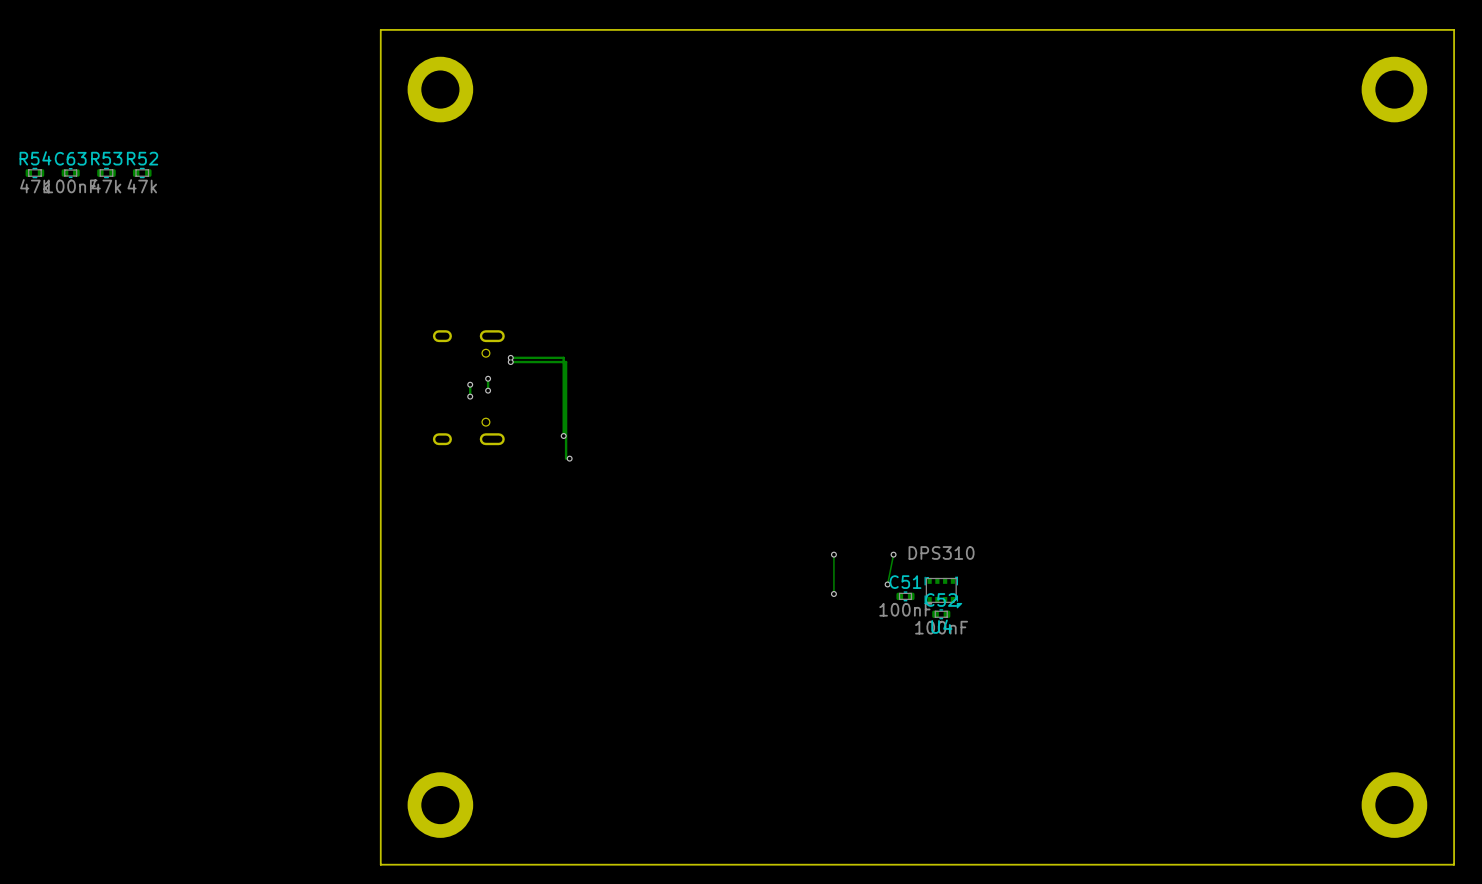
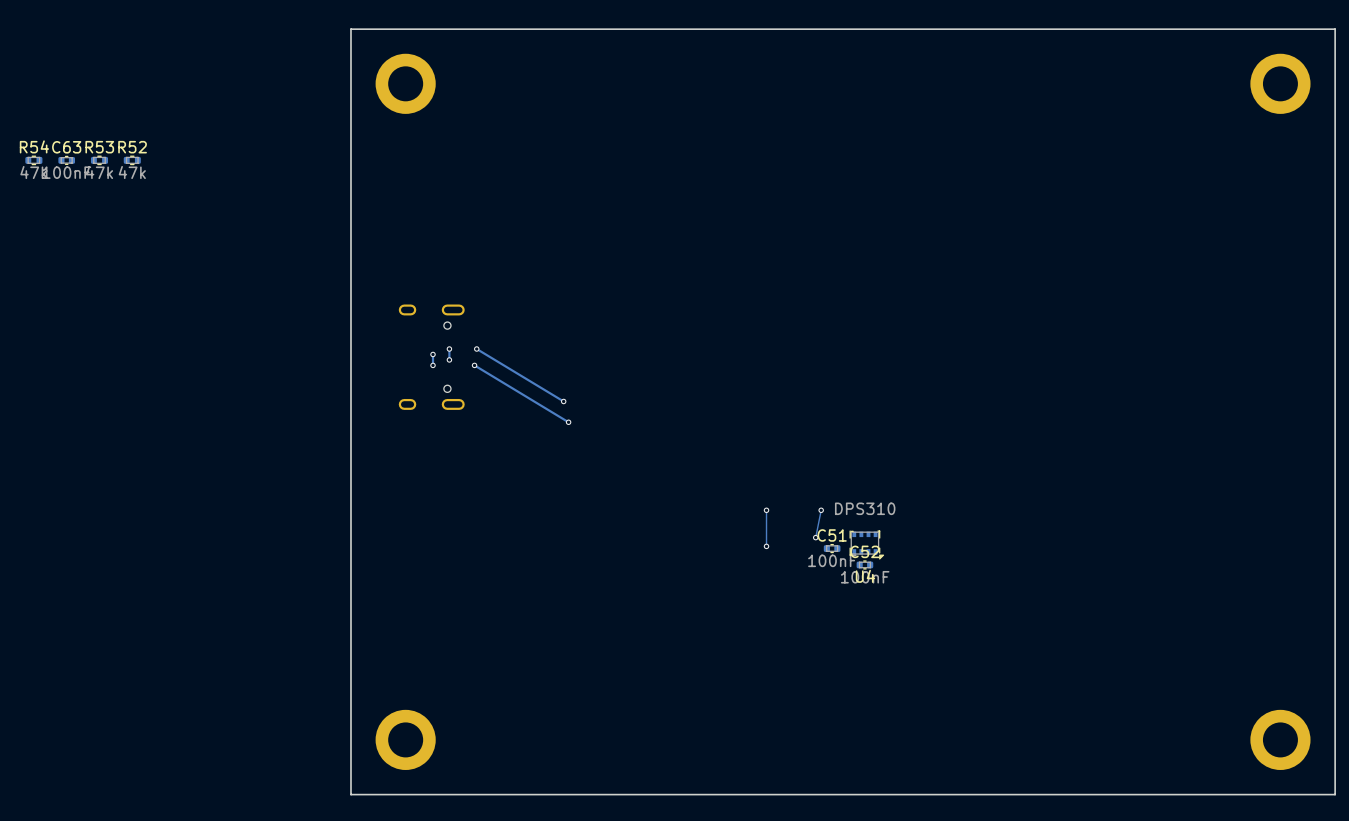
track: (510, 357) (563, 357) (563, 435) -> none
via: (510, 357) -> none
track: (510, 362) (566, 362) (566, 458) -> none
via: (510, 362) -> none
track: none -> (476, 349) (563, 401)
via: none -> (476, 349)
track: none -> (474, 365) (568, 422)
via: none -> (474, 365)
via: (563, 435) -> none
via: none -> (563, 401)
via: (569, 458) -> none
via: none -> (568, 422)

